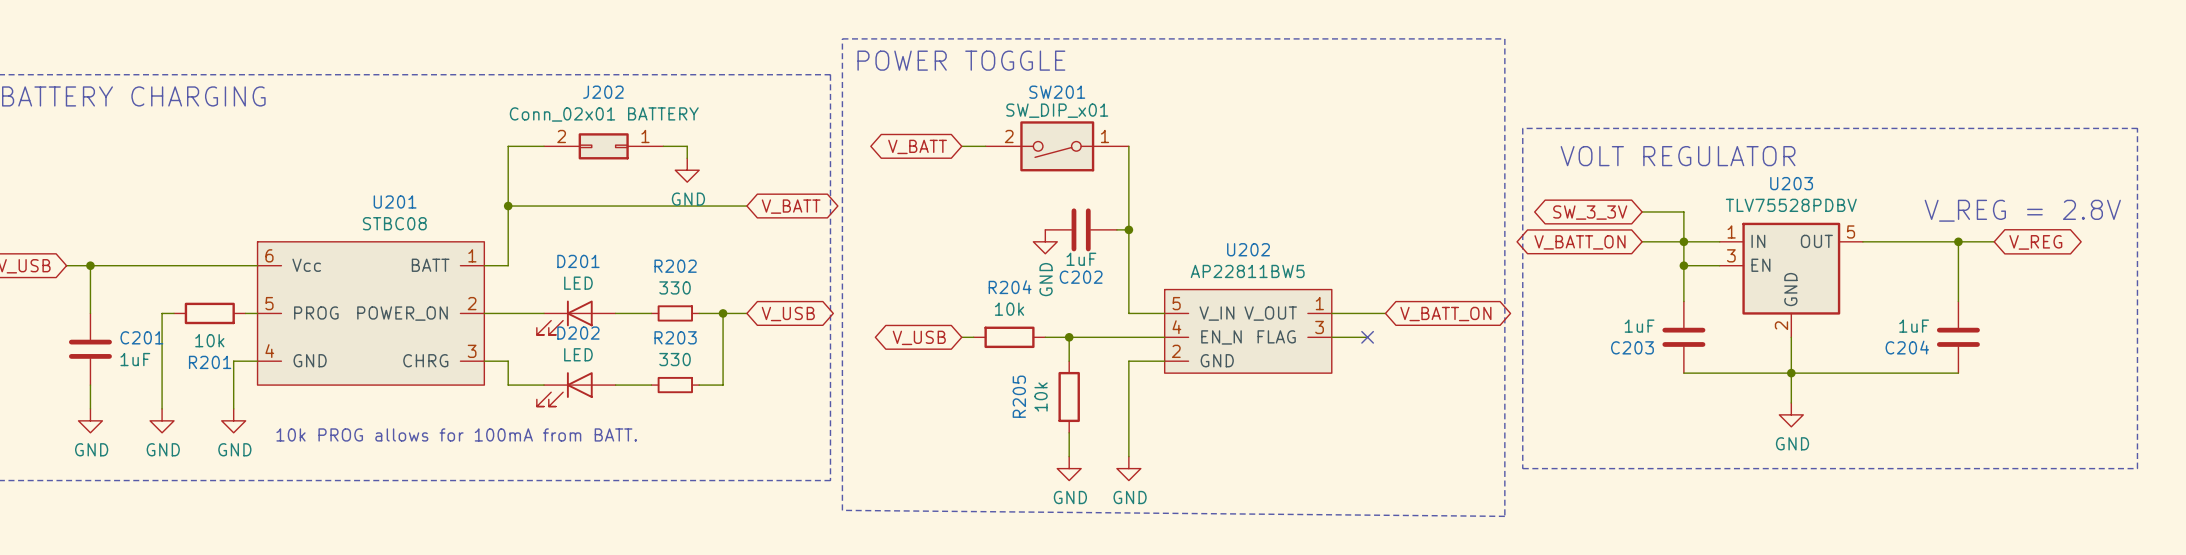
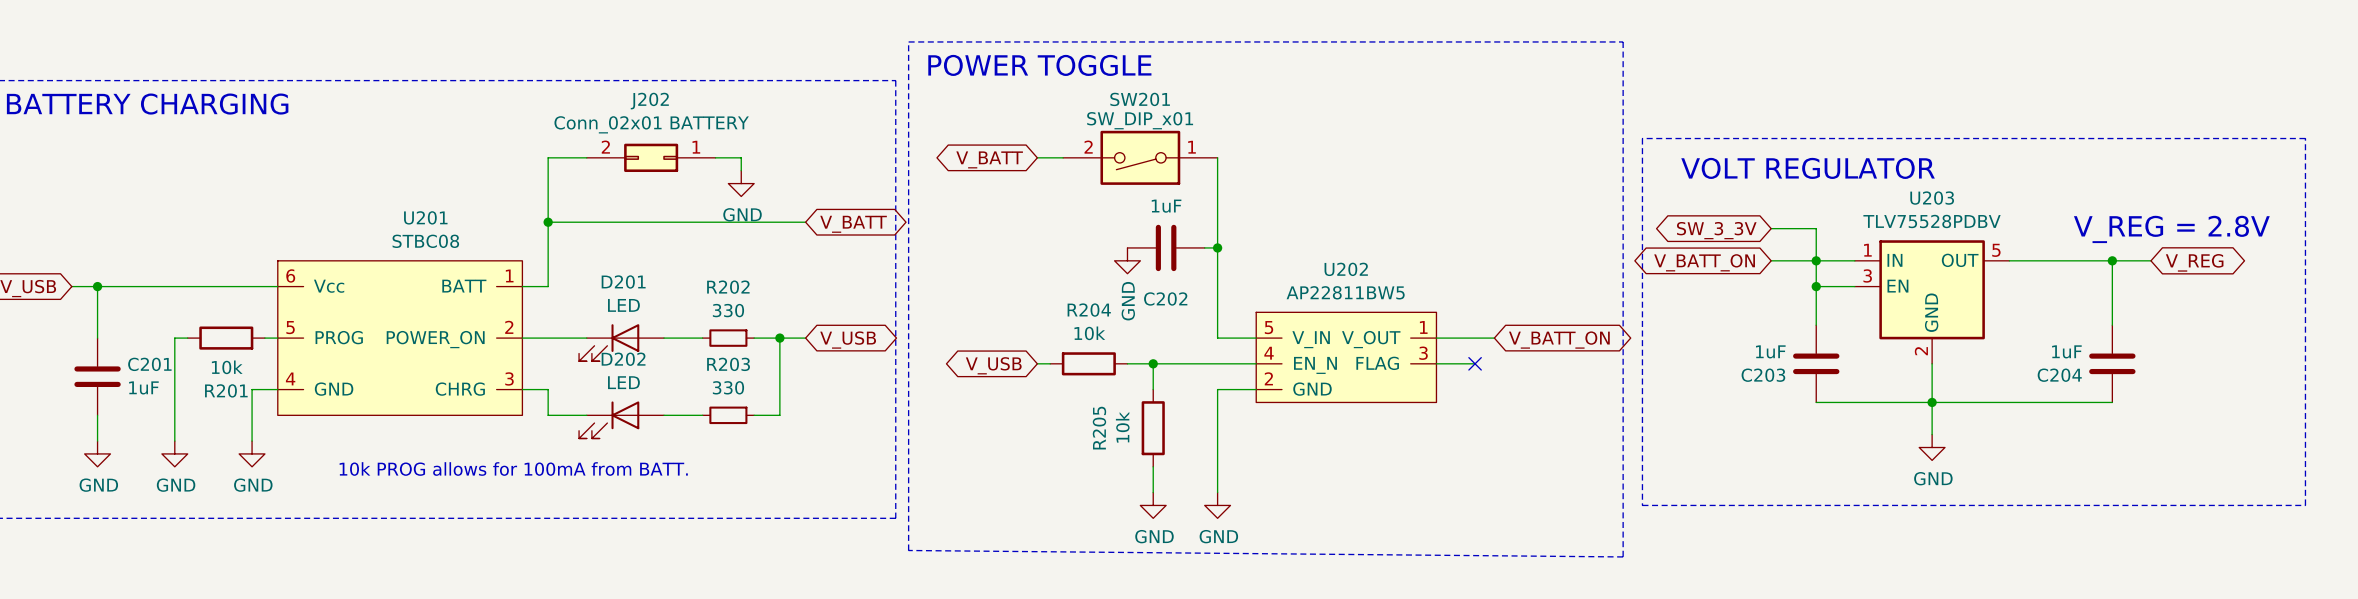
C202 value position: 1uF (1081, 259) -> 1uF (1166, 206)

